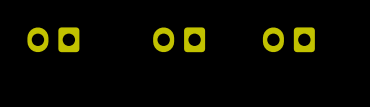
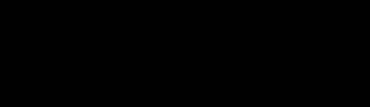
part: (53, 39) -> none
part: (179, 39) -> none
part: (288, 39) -> none

